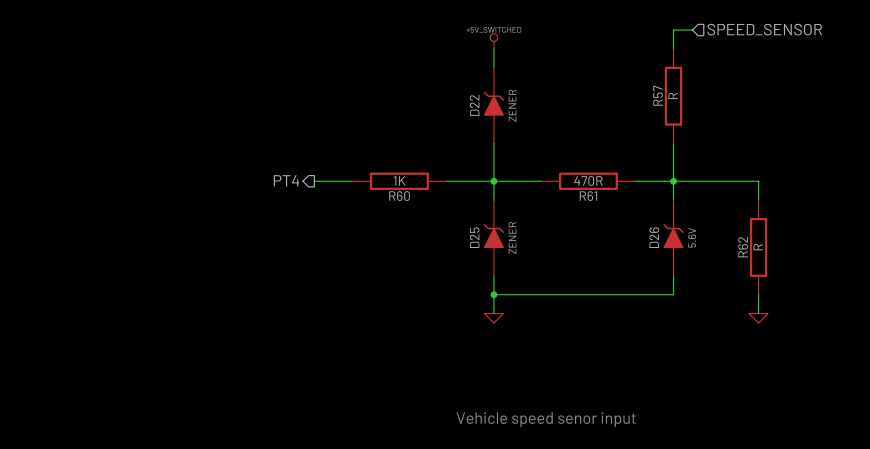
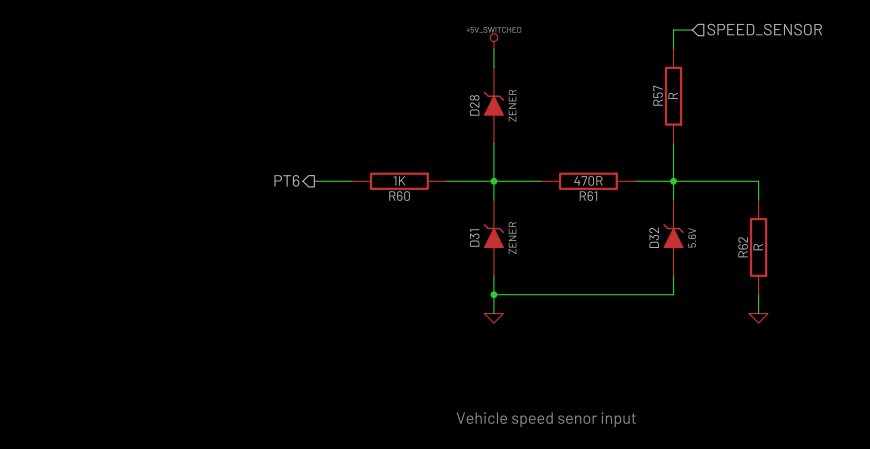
D22 name: D22 (474, 105) -> D28 (474, 105)
hierarchical label: PT4 (286, 180) -> PT6 (286, 180)
D25 name: D25 (474, 237) -> D31 (474, 237)
D26 name: D26 (654, 237) -> D32 (654, 237)

